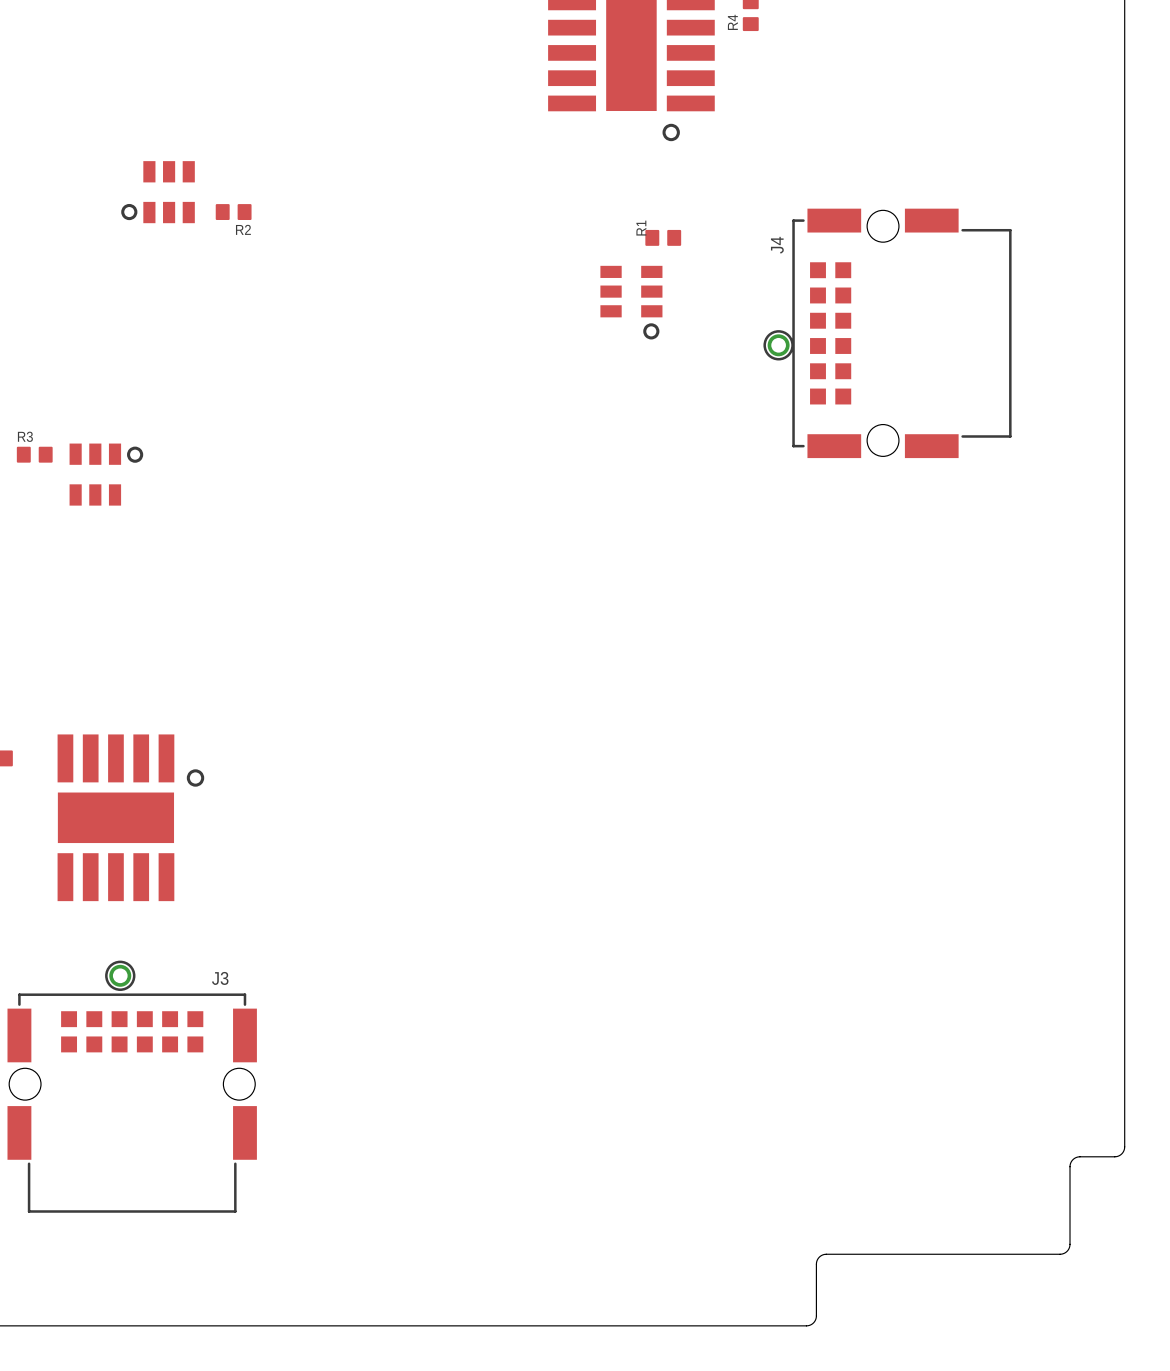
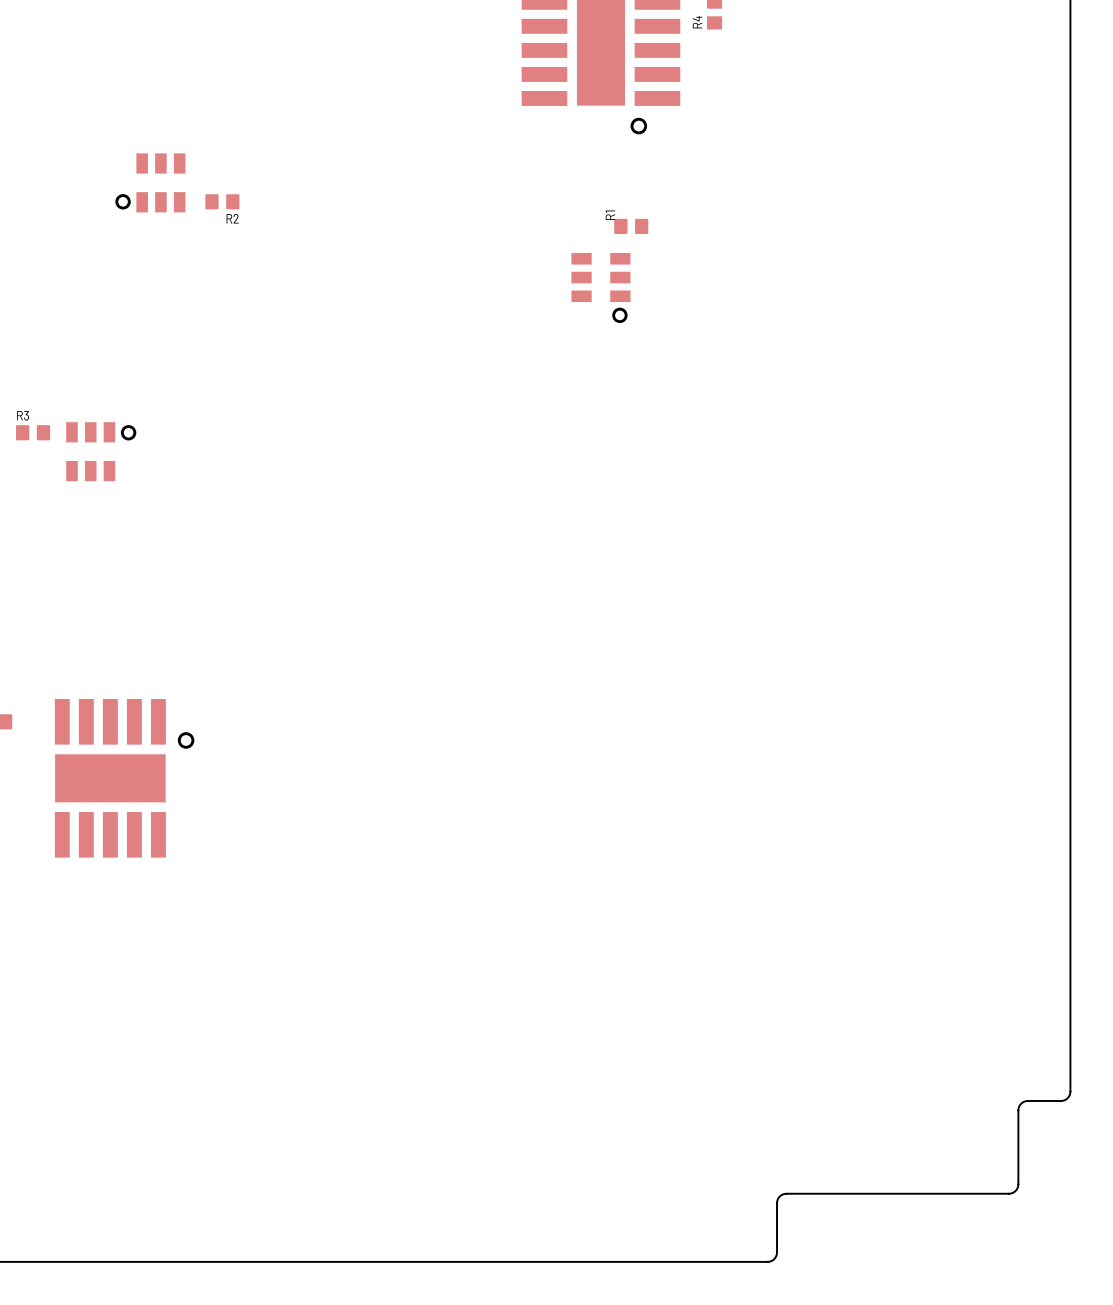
J4: (901, 333) -> none
part: (778, 345) -> none
part: (120, 975) -> none
J3: (132, 1103) -> none

